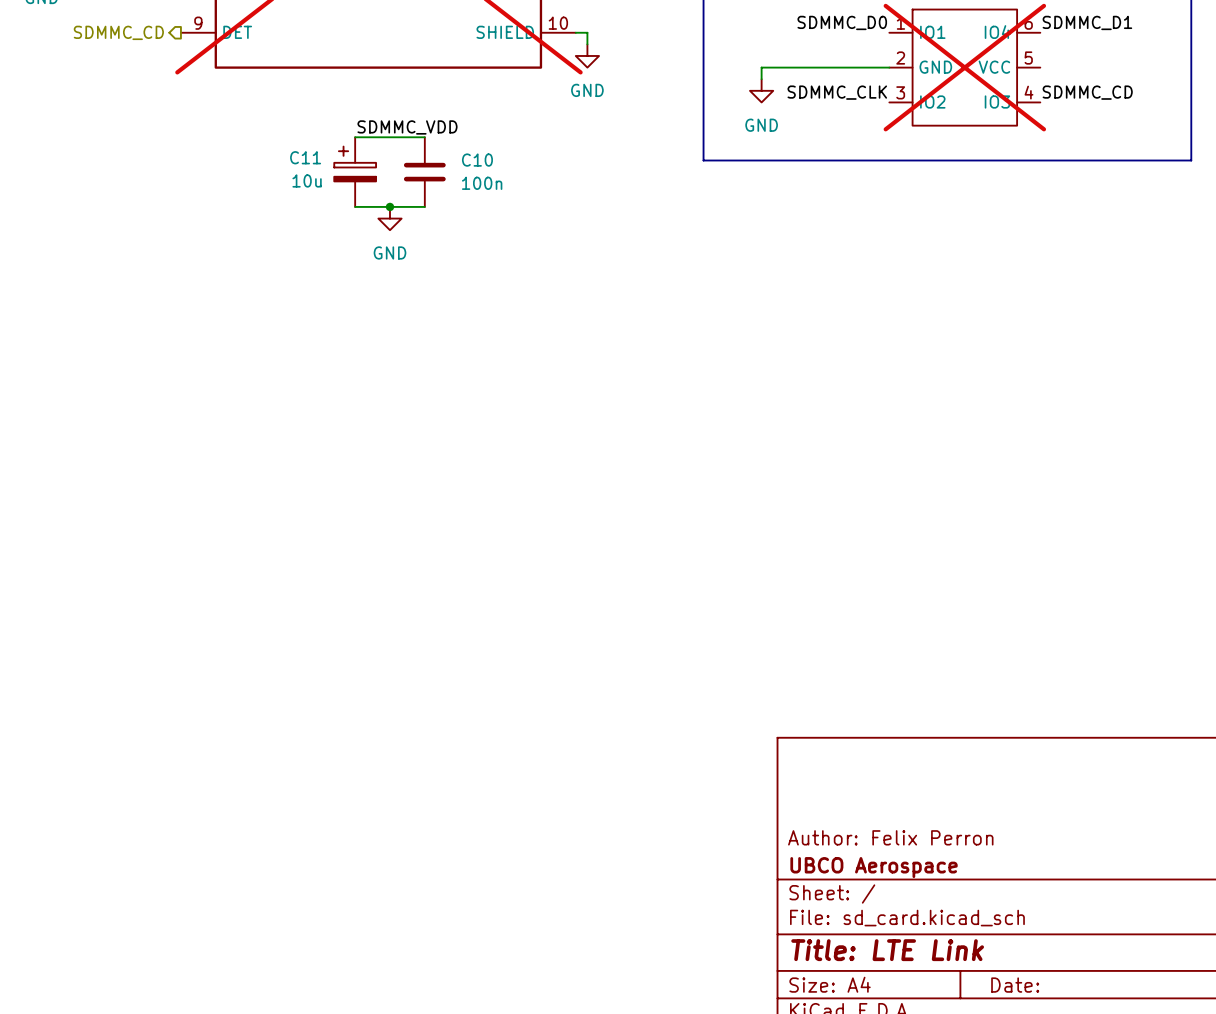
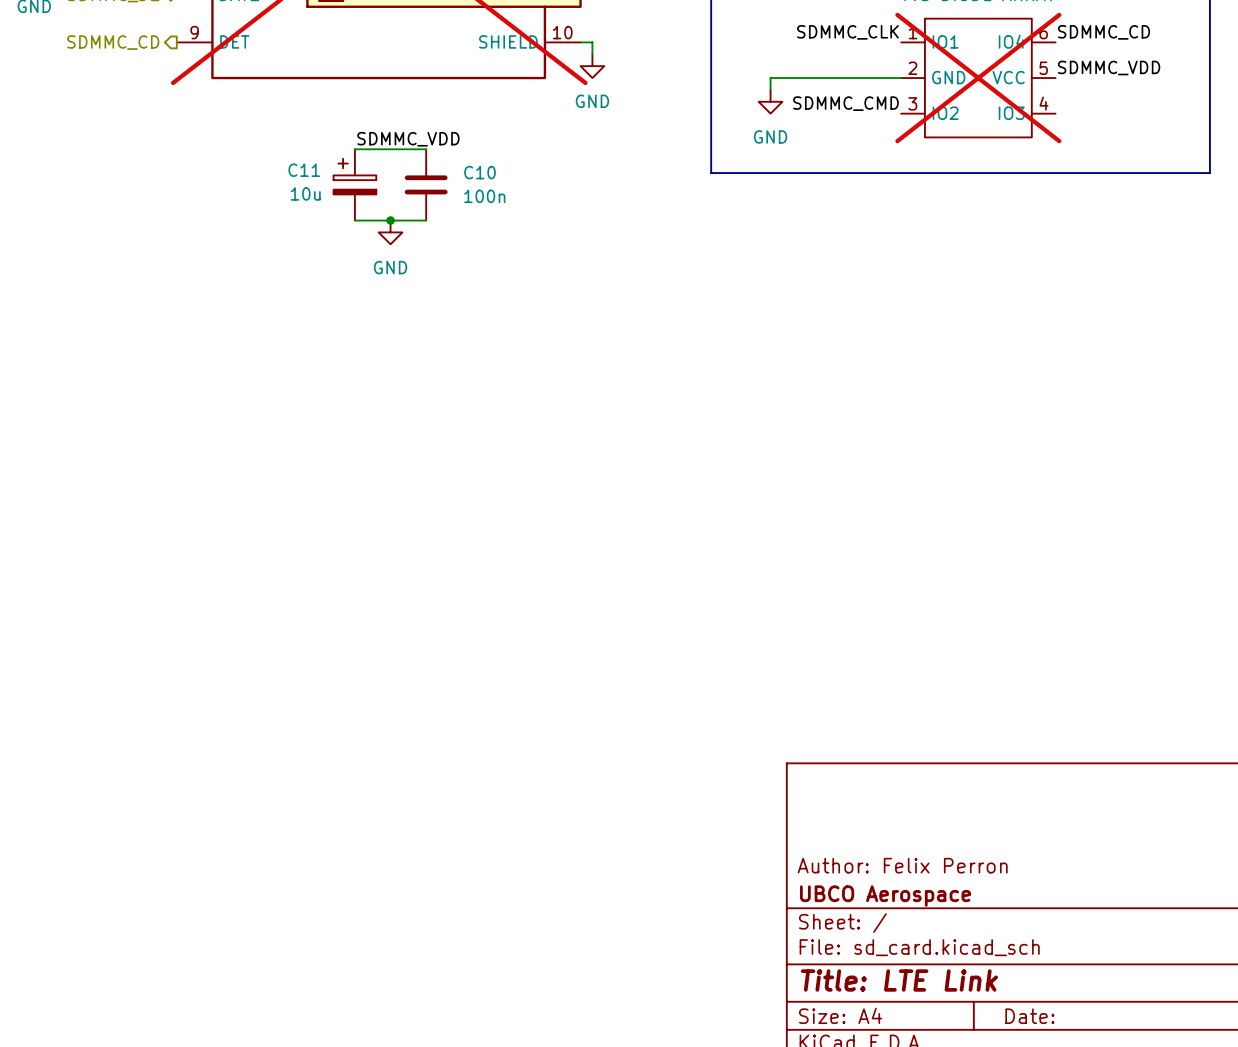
label: SDMMC_D0 (842, 22) -> SDMMC_CLK (847, 32)
label: SDMMC_D1 (1087, 22) -> SDMMC_CD (1104, 32)
label: none -> SDMMC_VDD (1109, 68)
label: SDMMC_CLK (837, 92) -> SDMMC_CMD (845, 103)
label: SDMMC_CD (1087, 92) -> none

